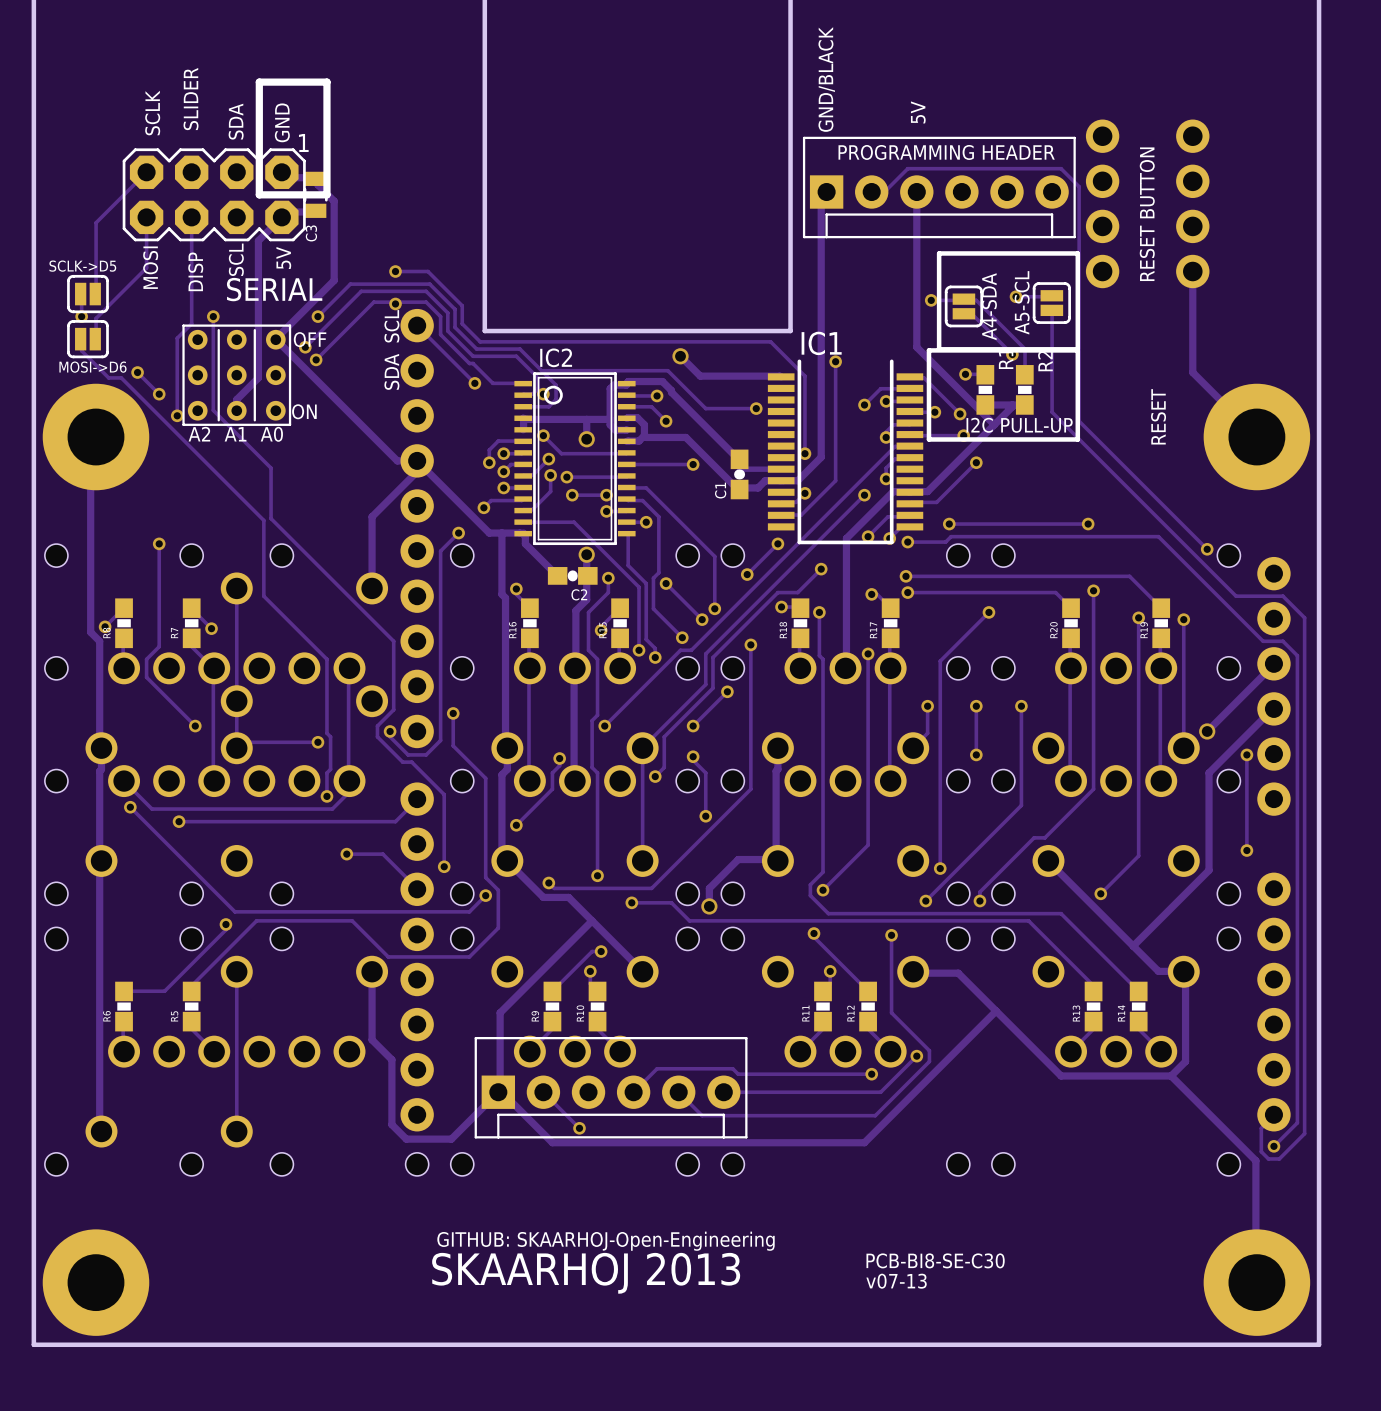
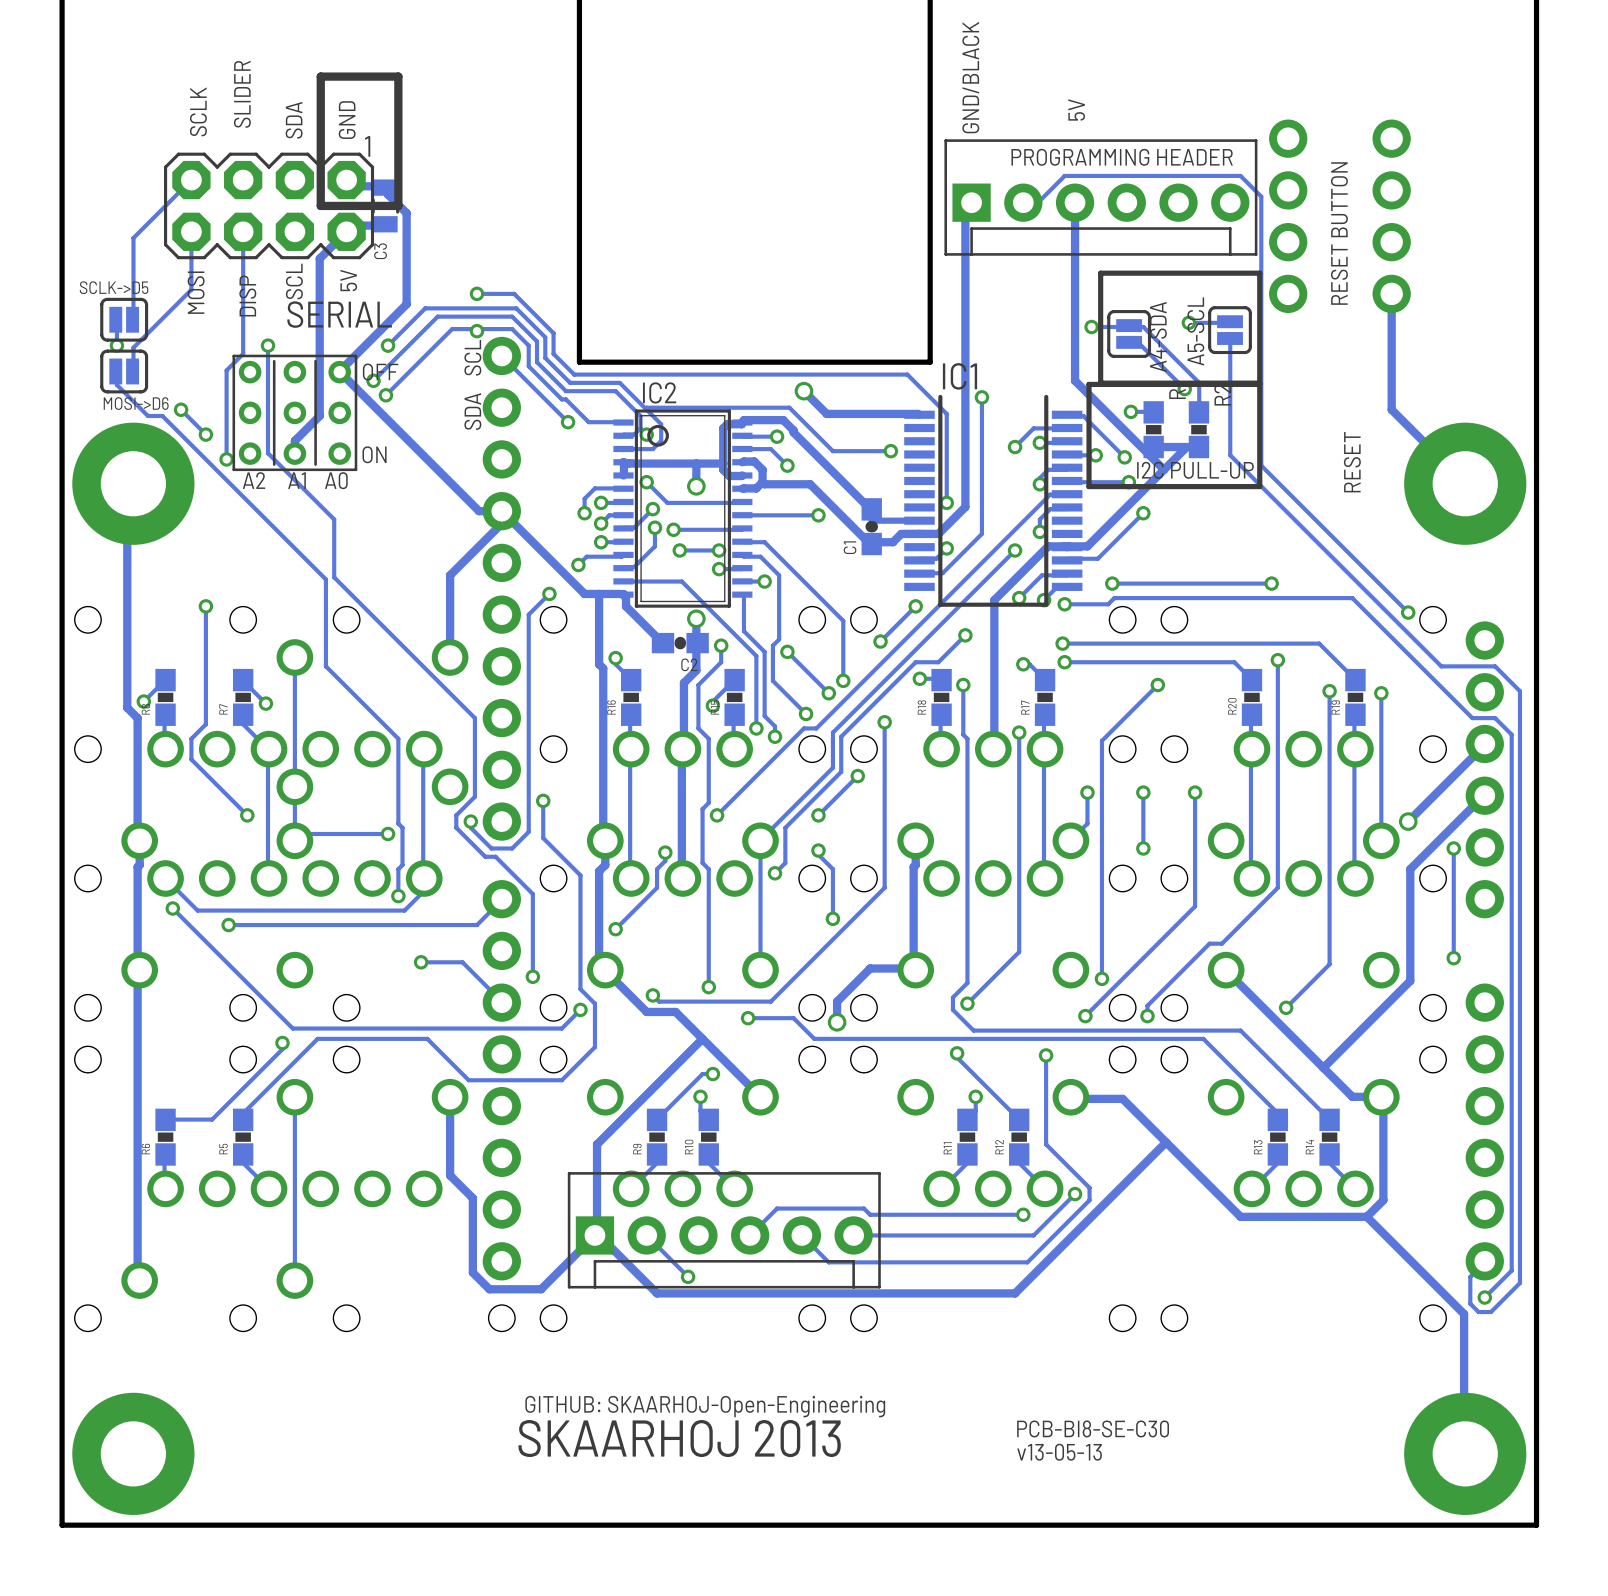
text: v07-13 (896, 1281) -> v13-05-13 (1059, 1452)

